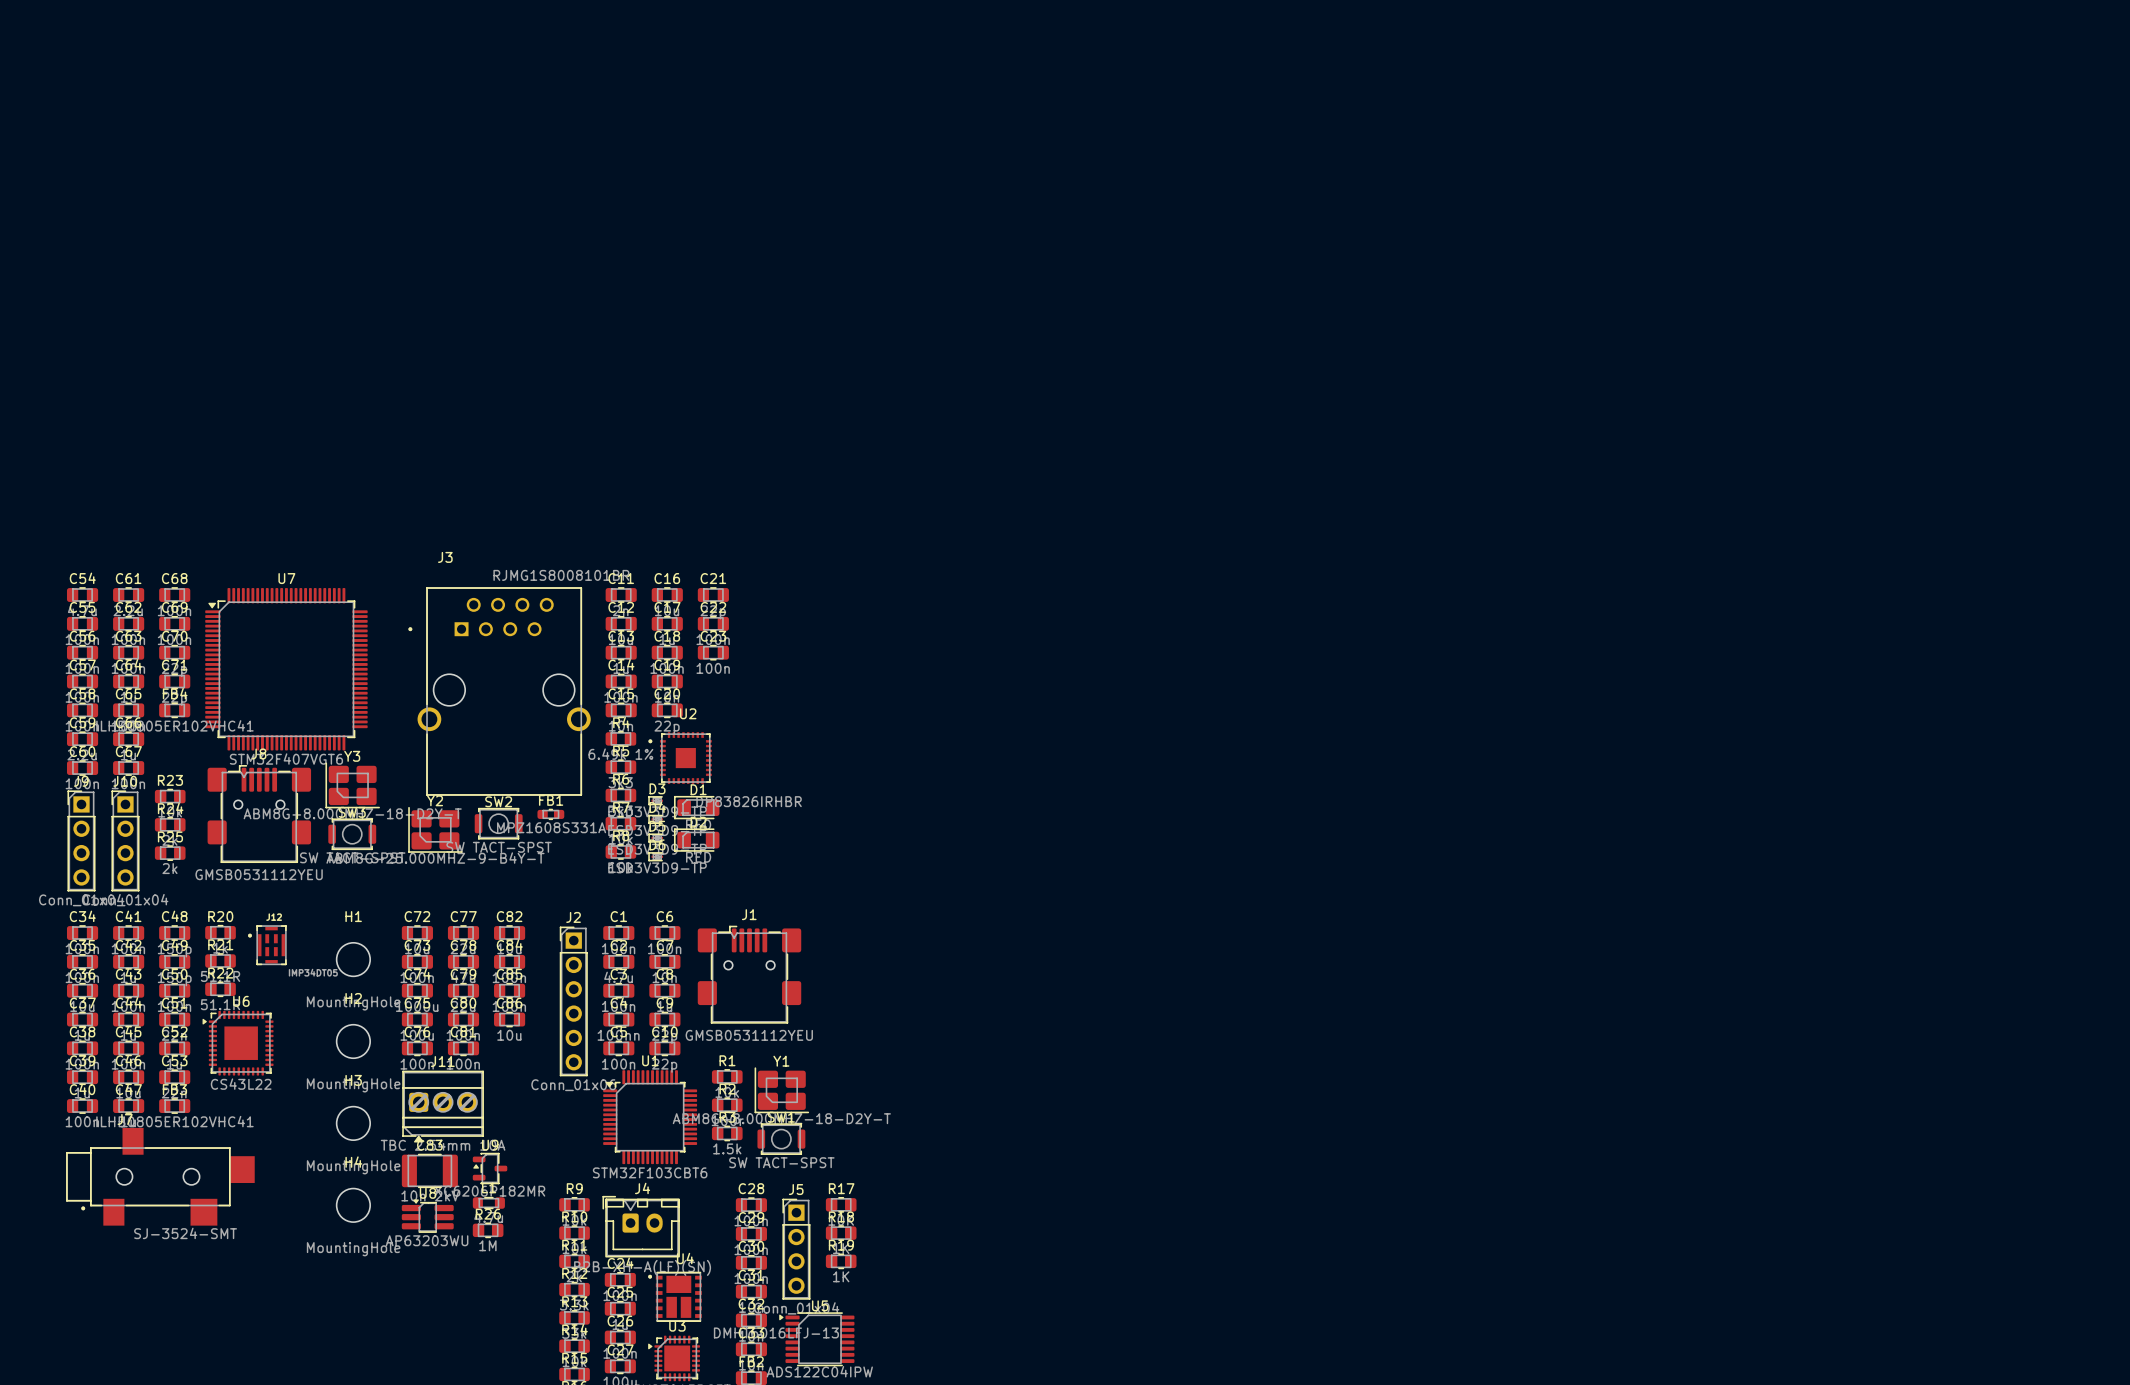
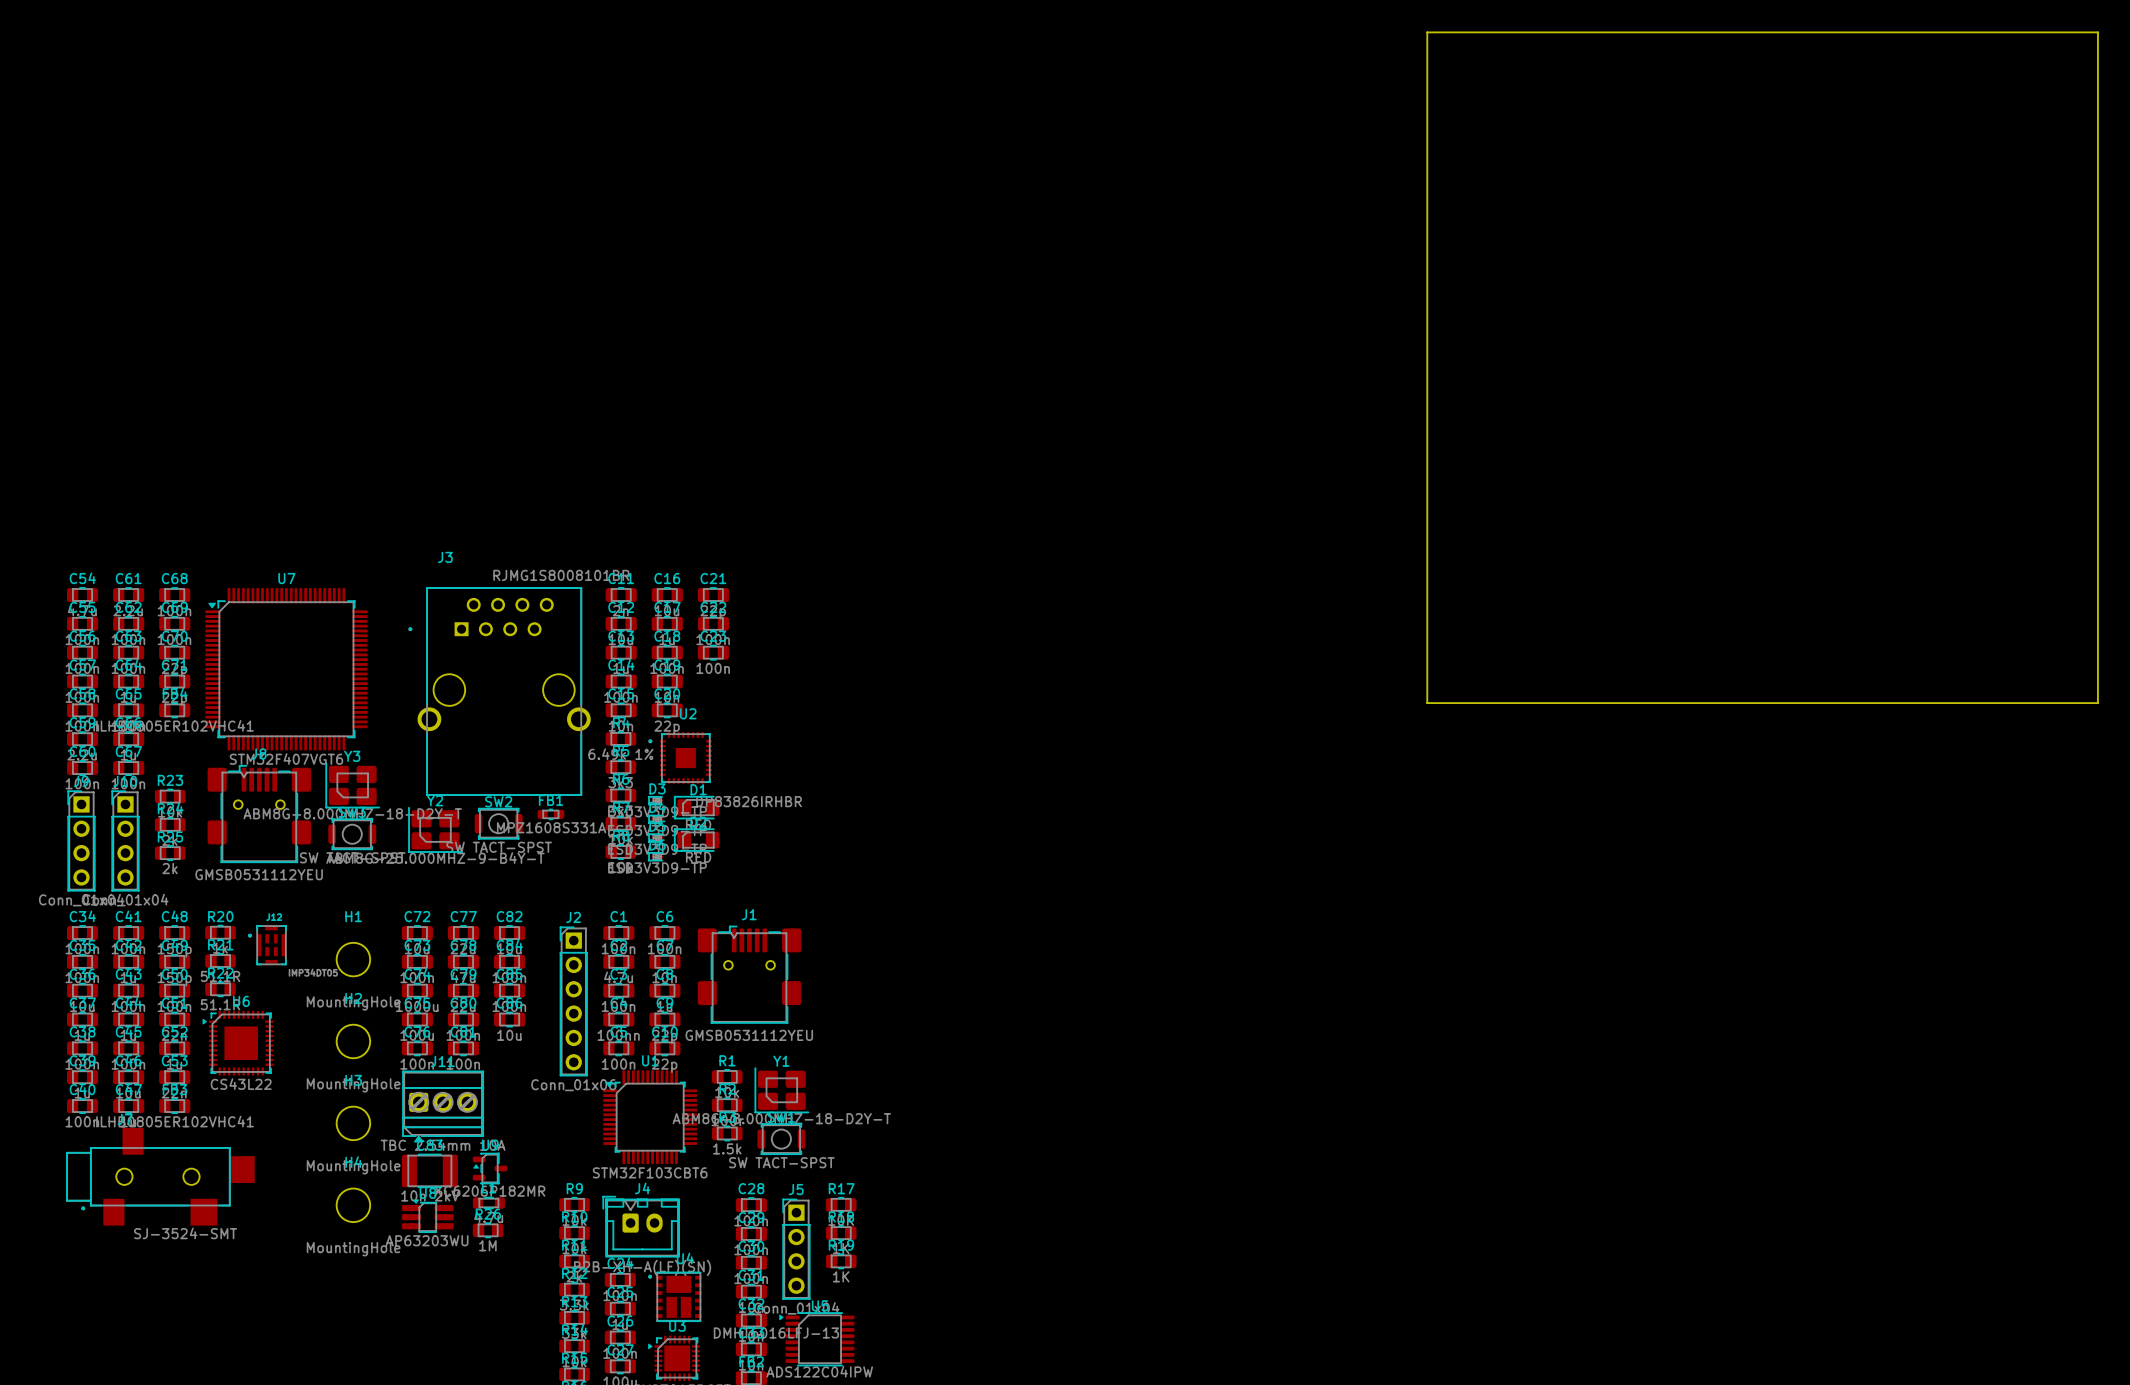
board edge: none -> (1427, 32) (2097, 32) (2097, 703) (1427, 703) (1427, 32)

